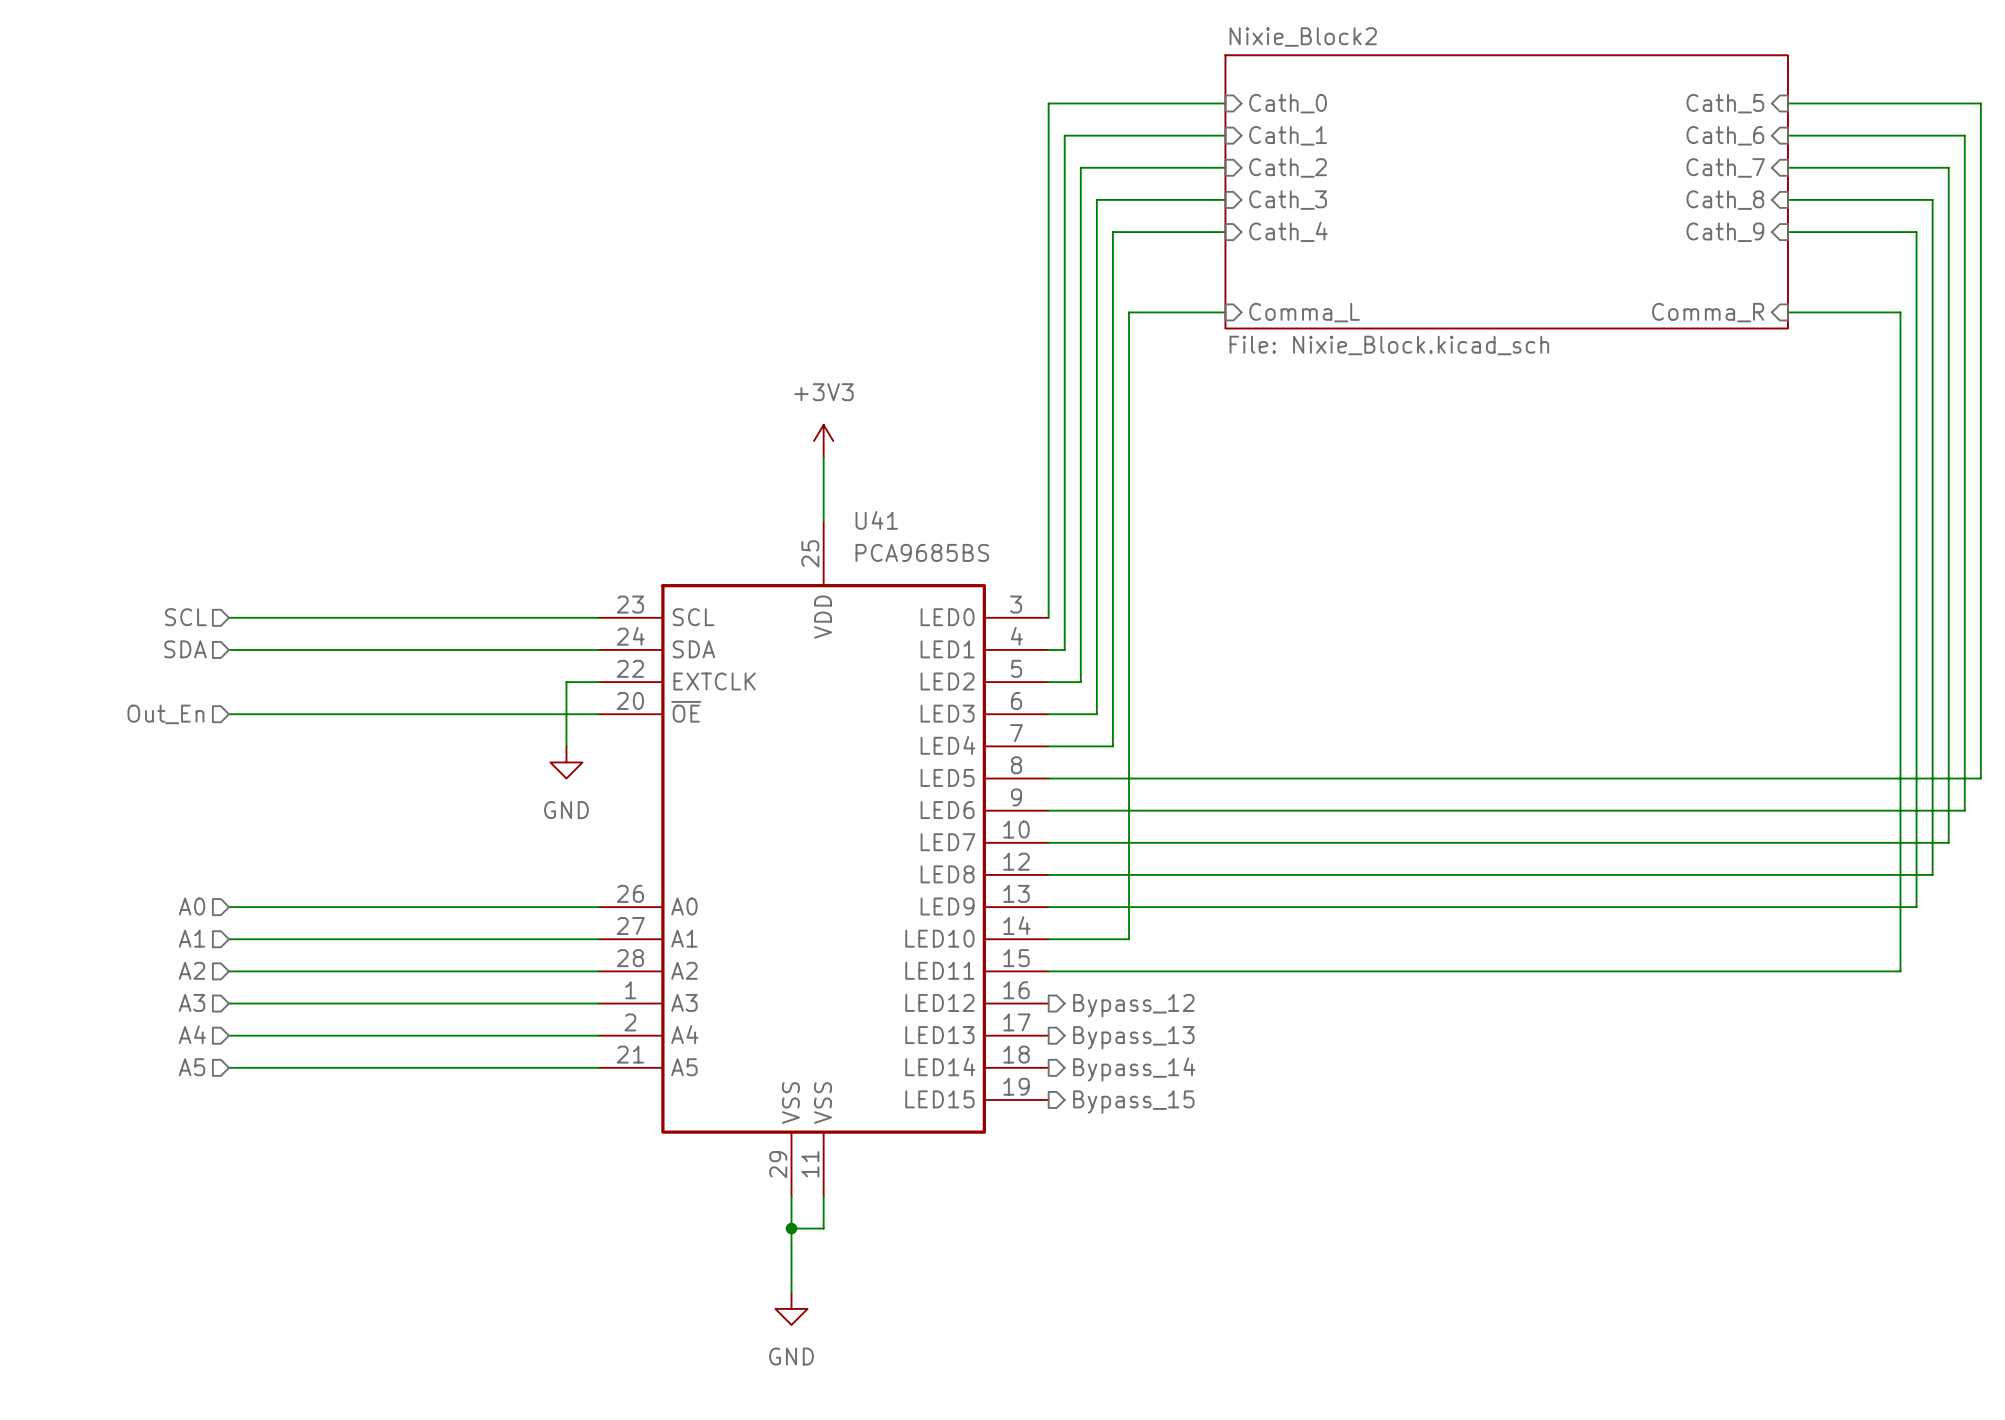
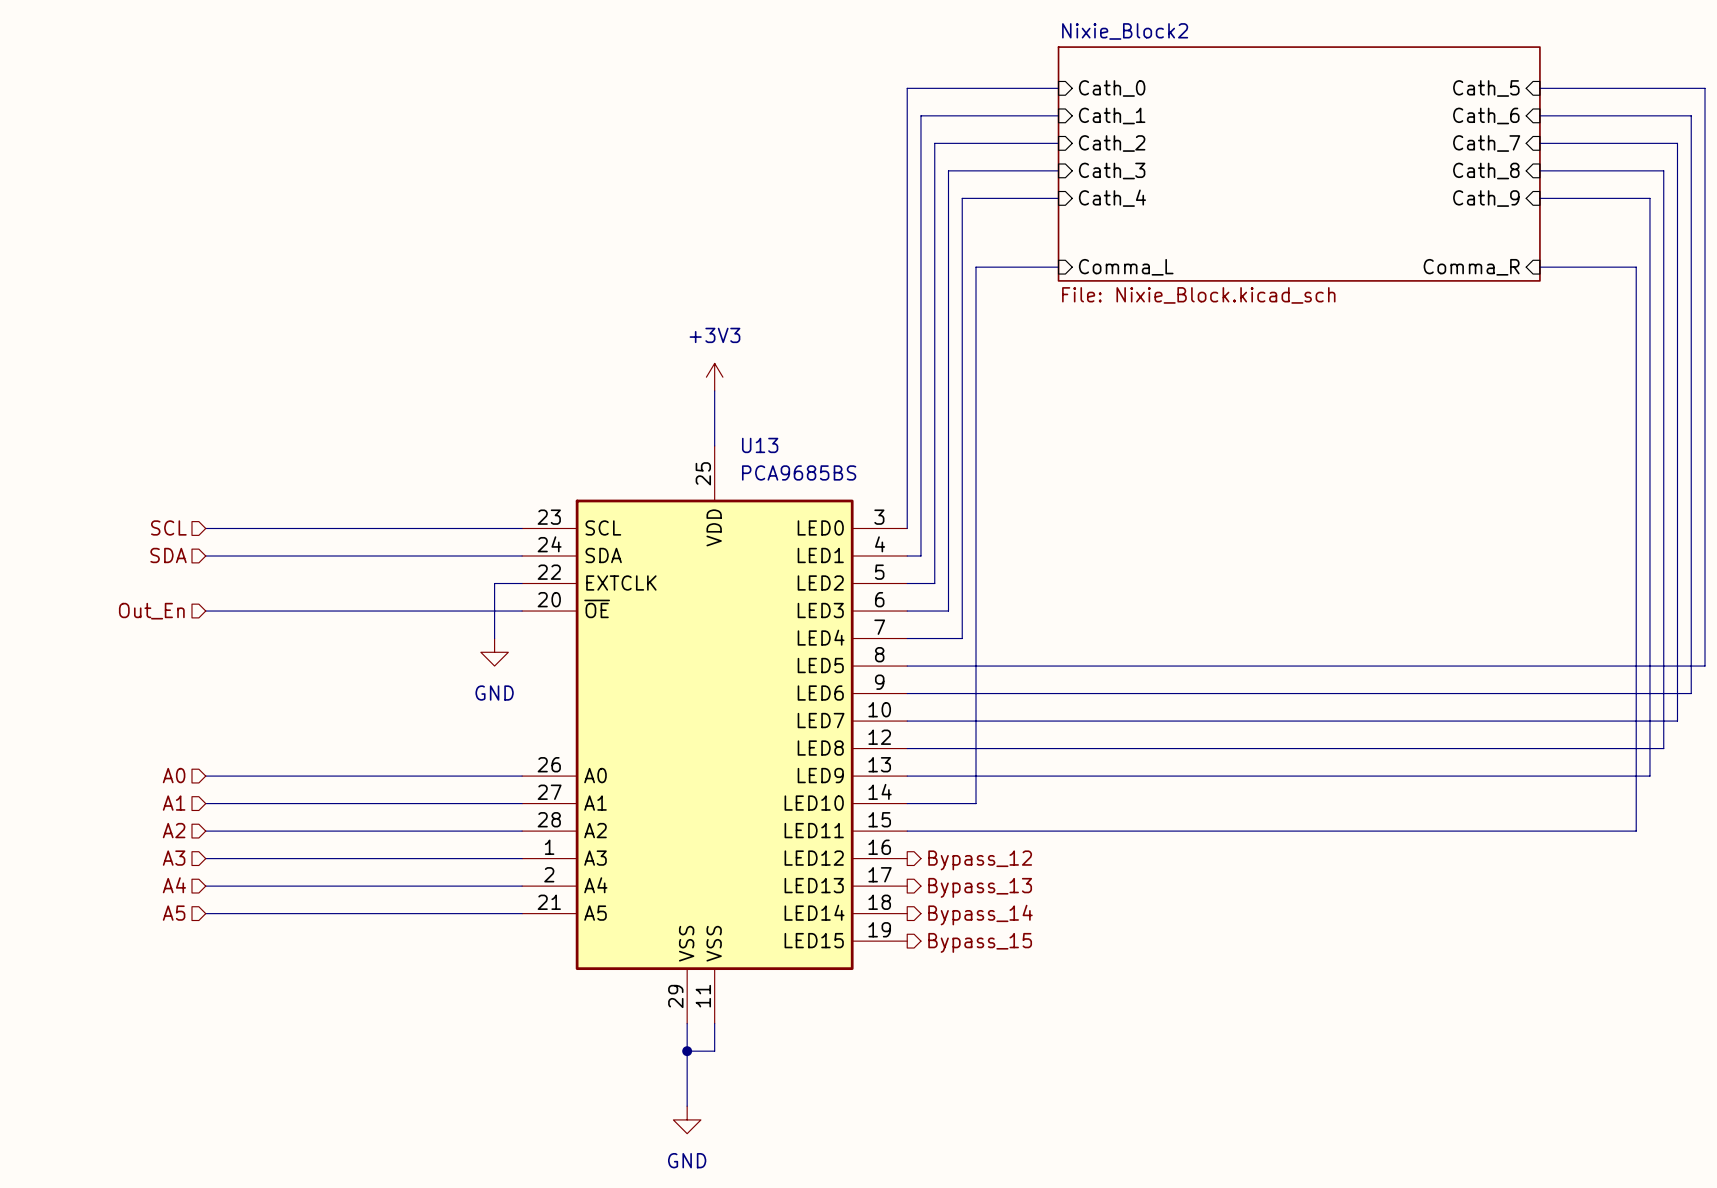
U41 name: U41 (876, 520) -> U13 (760, 445)

